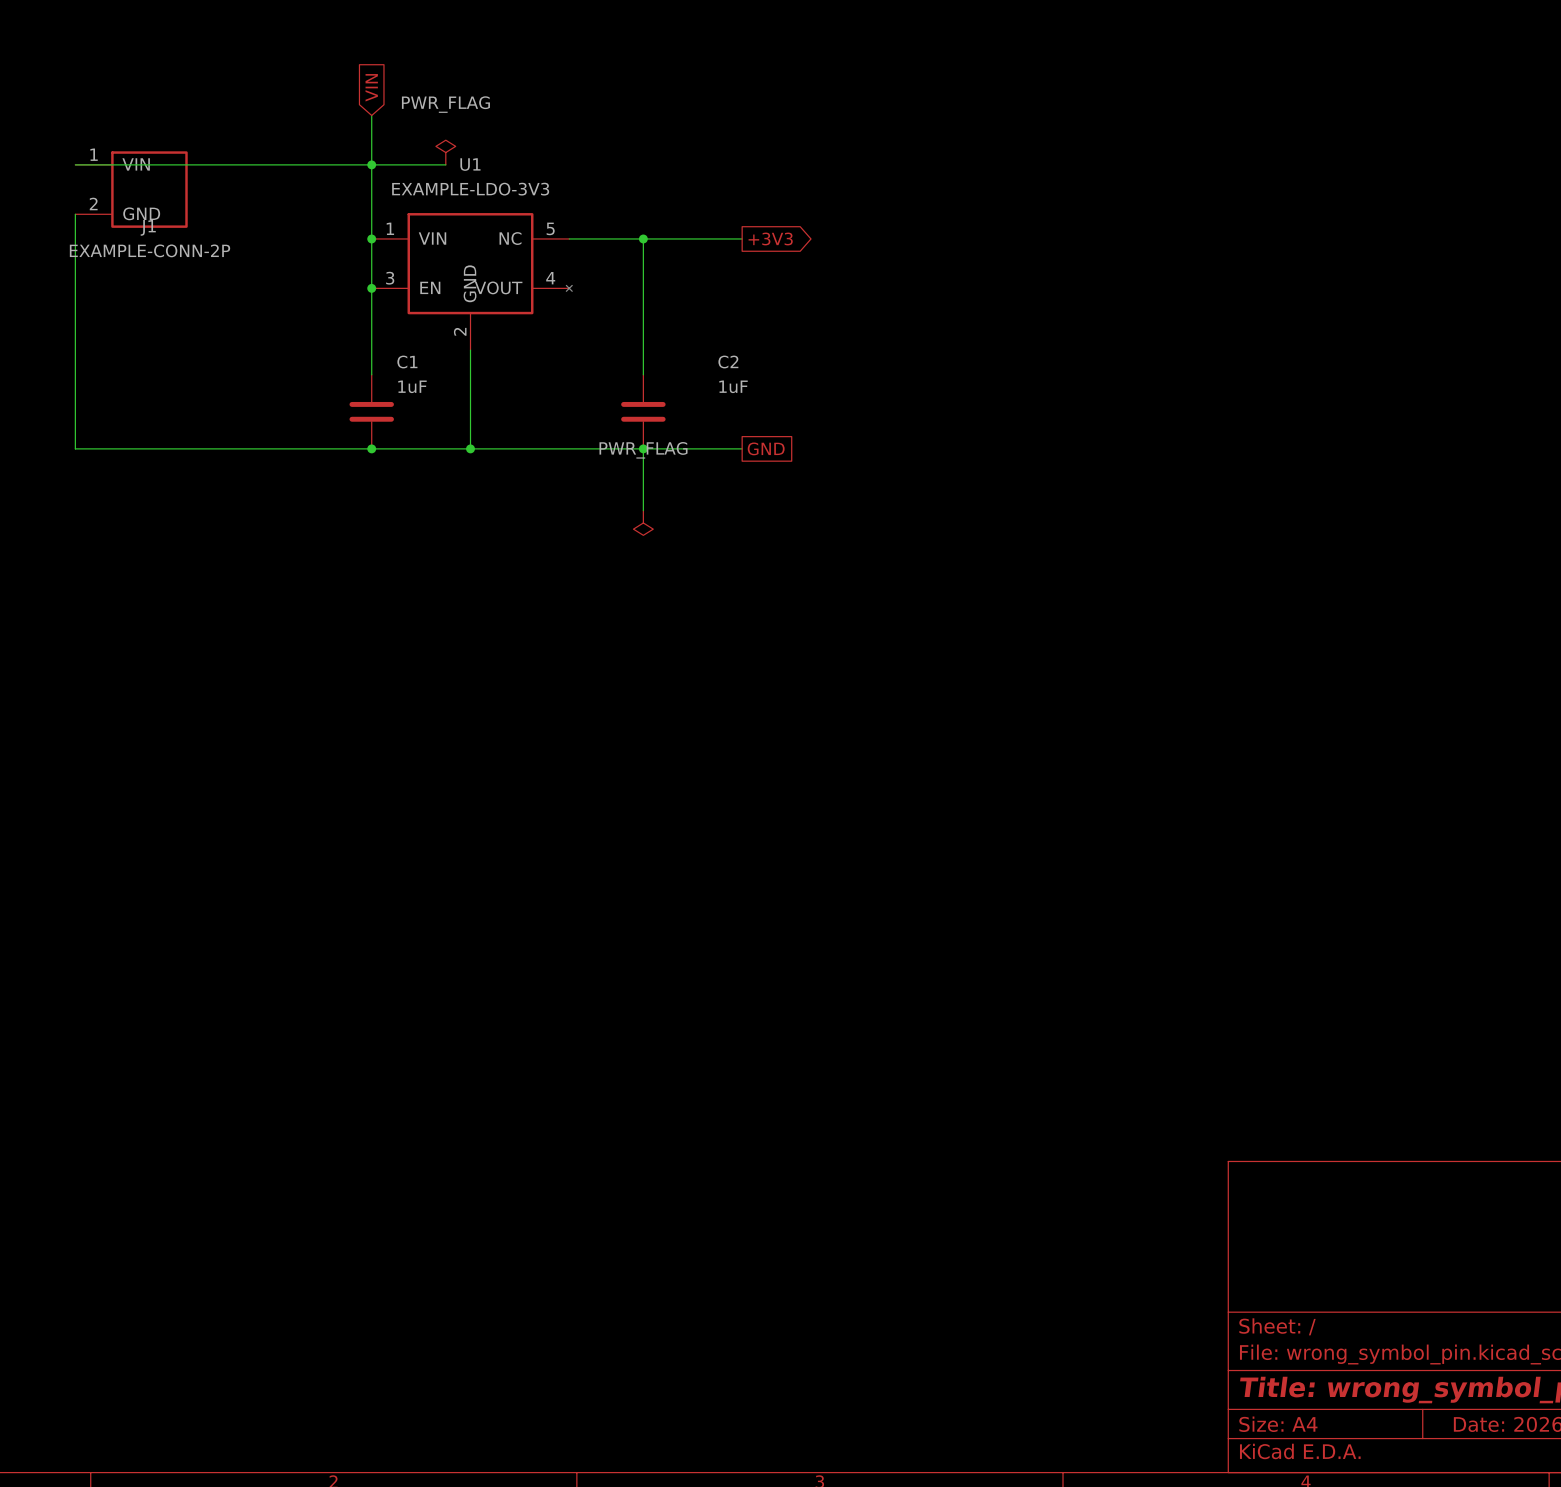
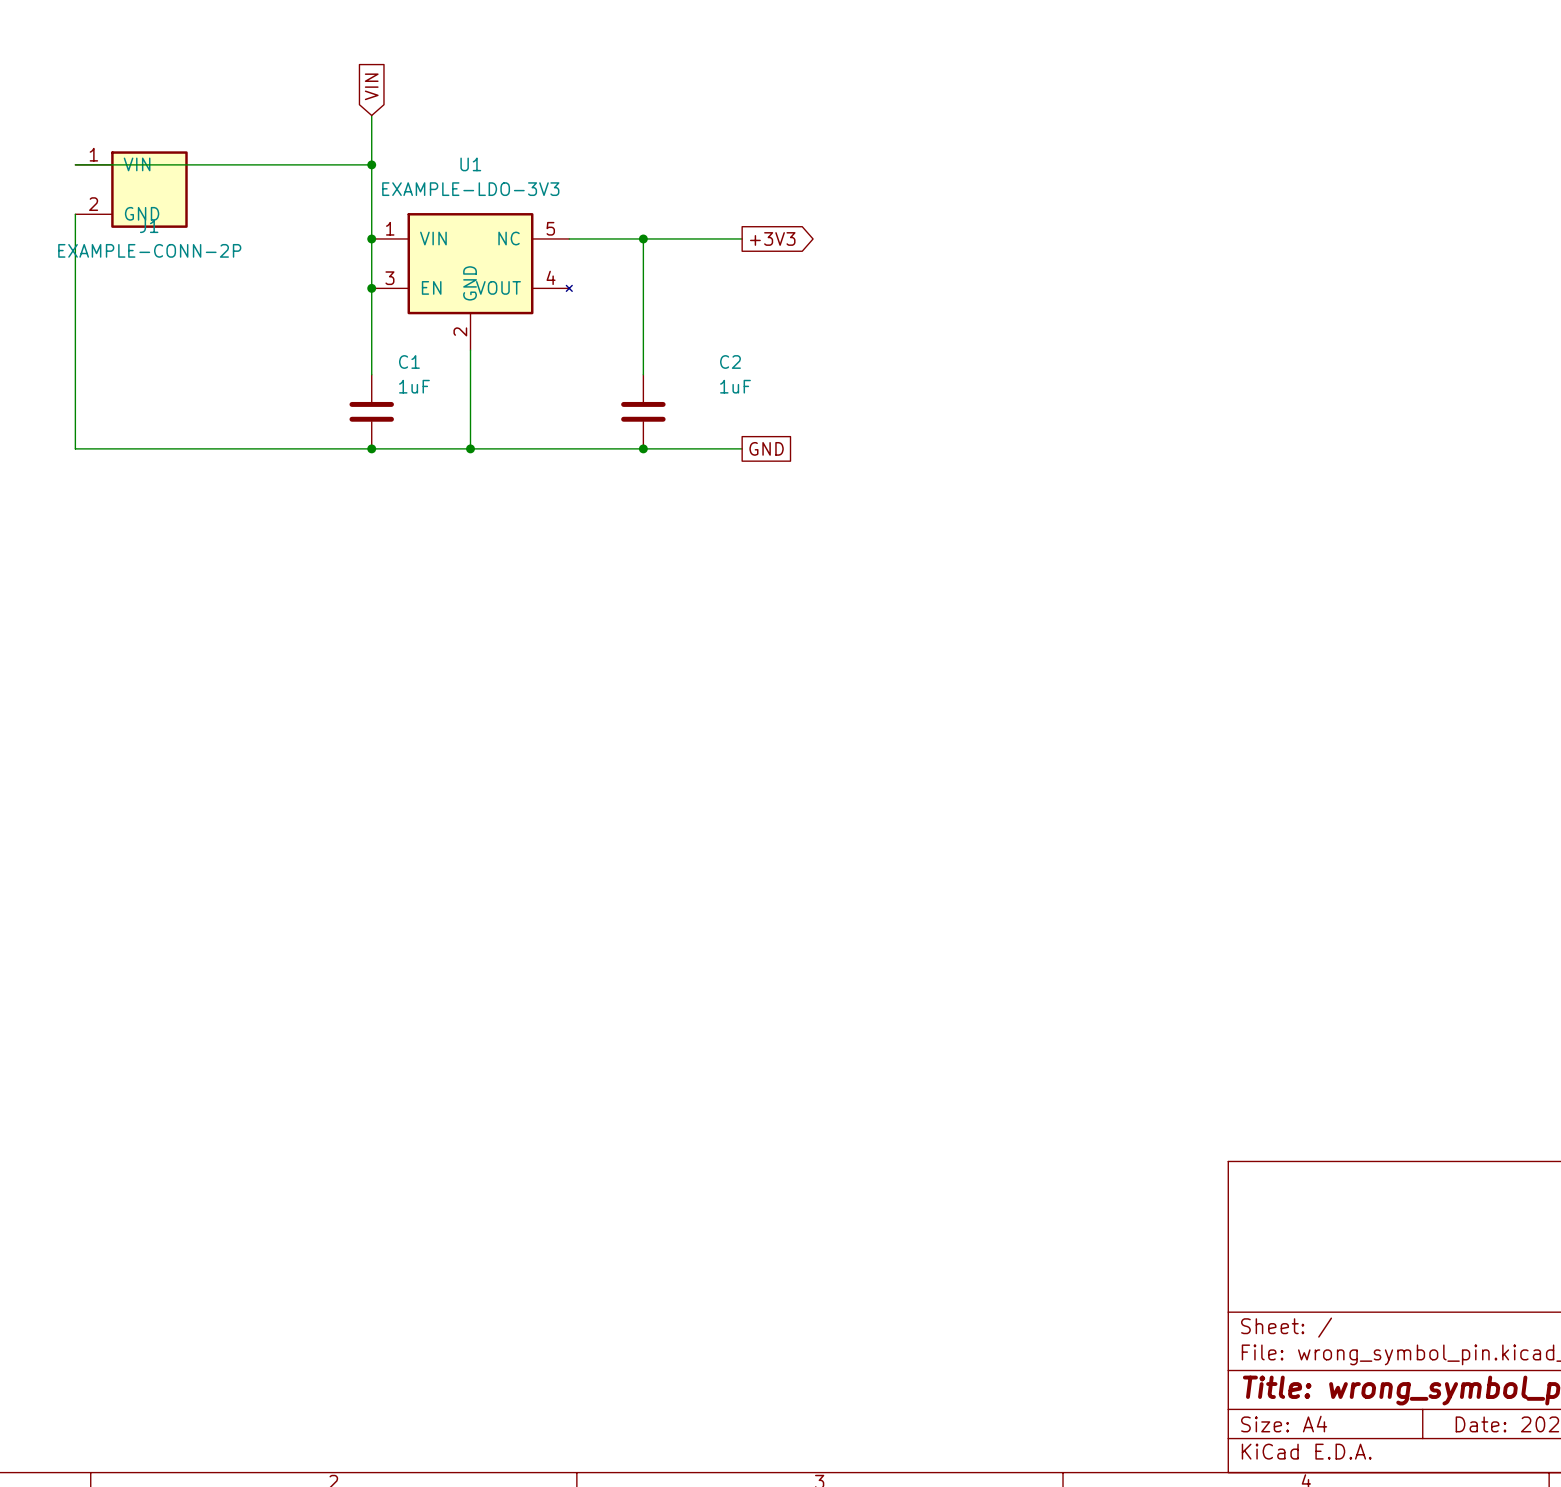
power symbol: PWR_FLAG (445, 152) -> none
wire: (371, 164) (445, 164) -> none
wire: (643, 448) (643, 510) -> none
power symbol: PWR_FLAG (643, 522) -> none

